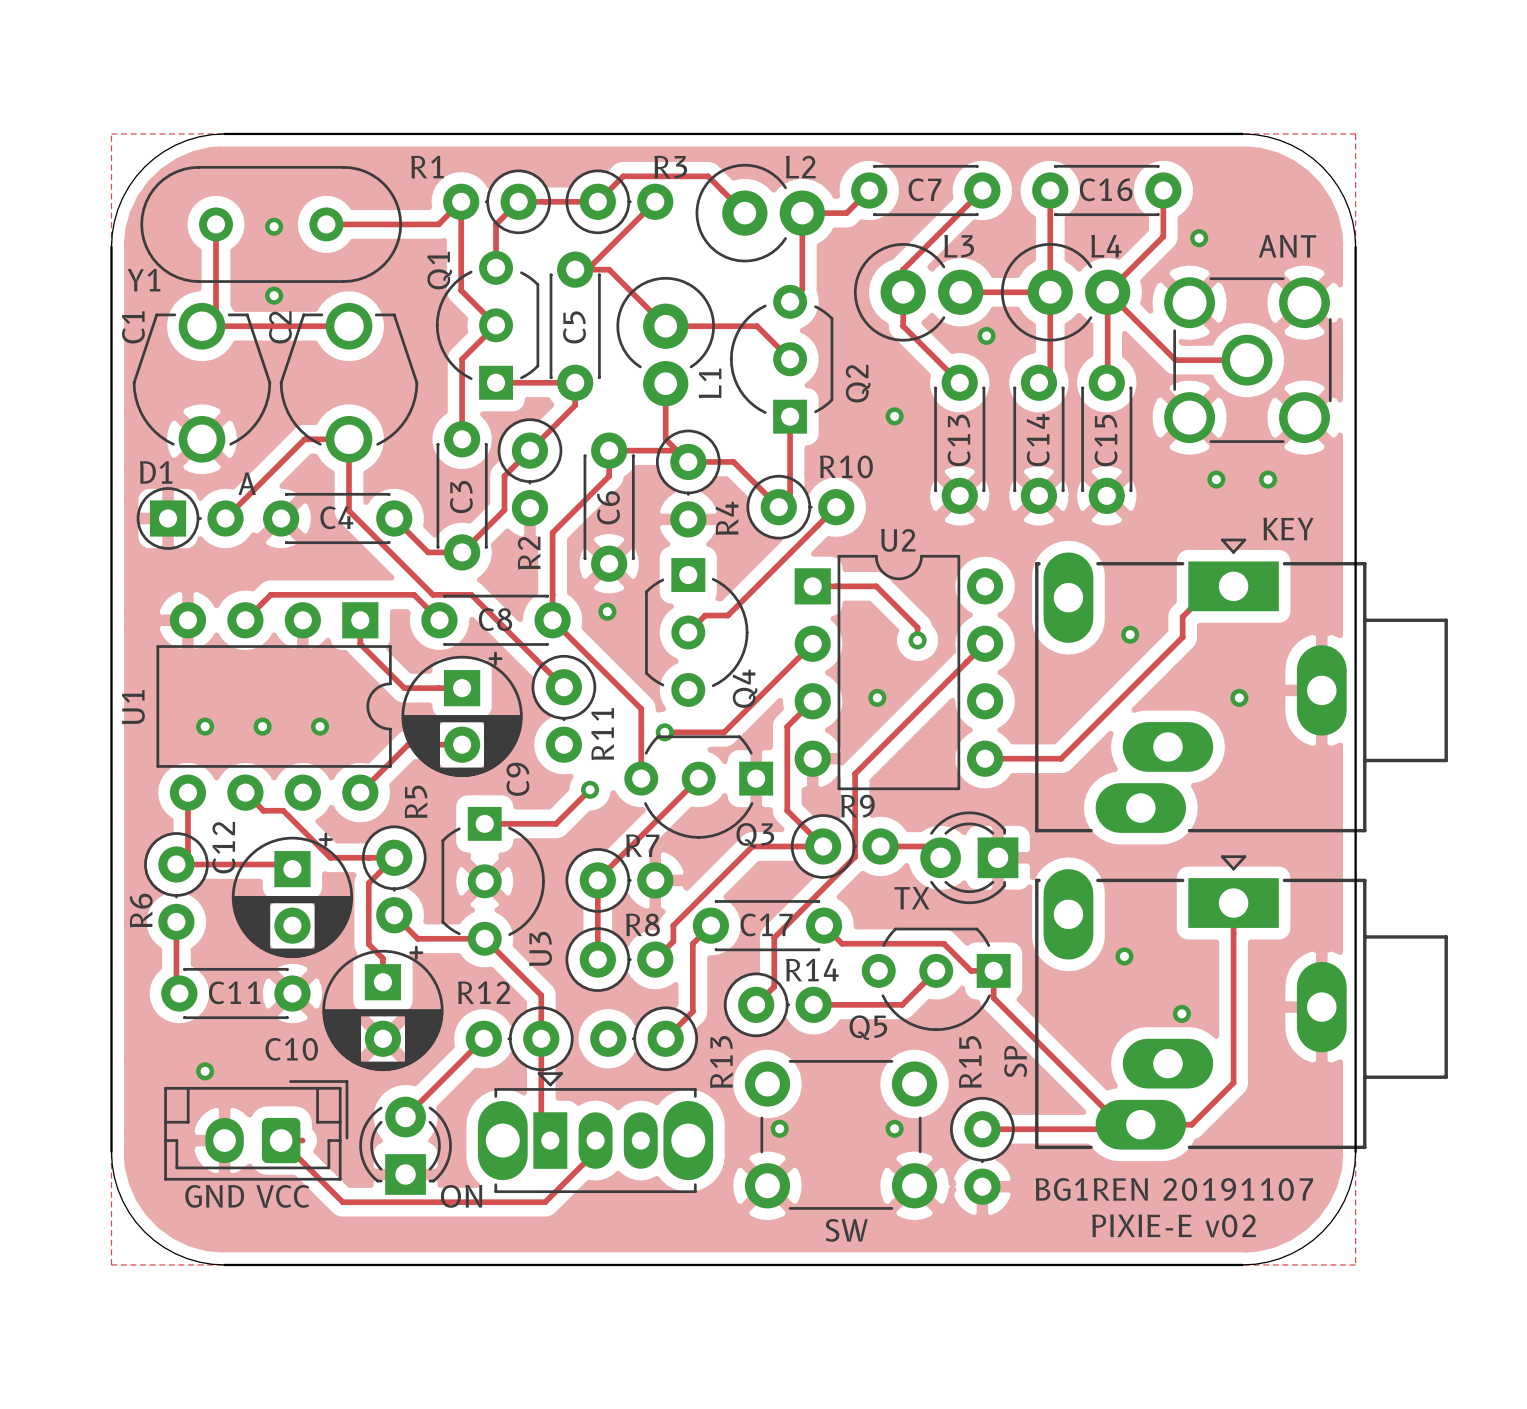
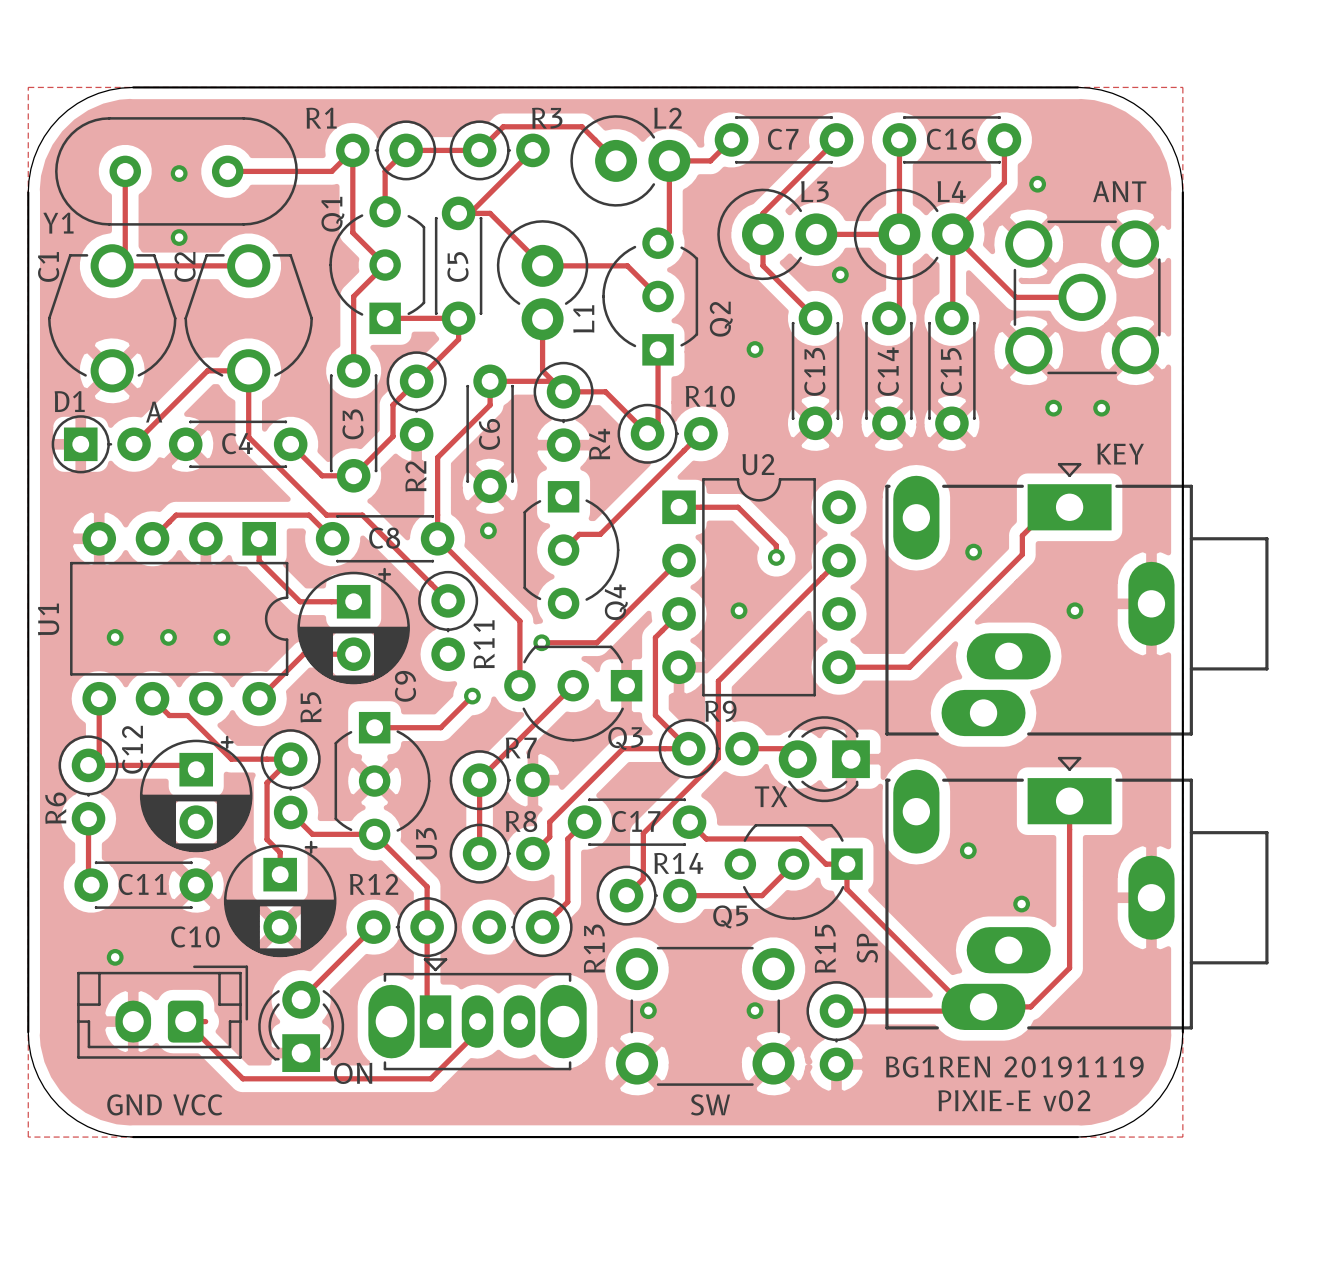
text: BG1REN 20191107 (1174, 1189) -> BG1REN 20191119 (1014, 1067)
text position: GND VCC (247, 1196) -> GND VCC (164, 1104)

